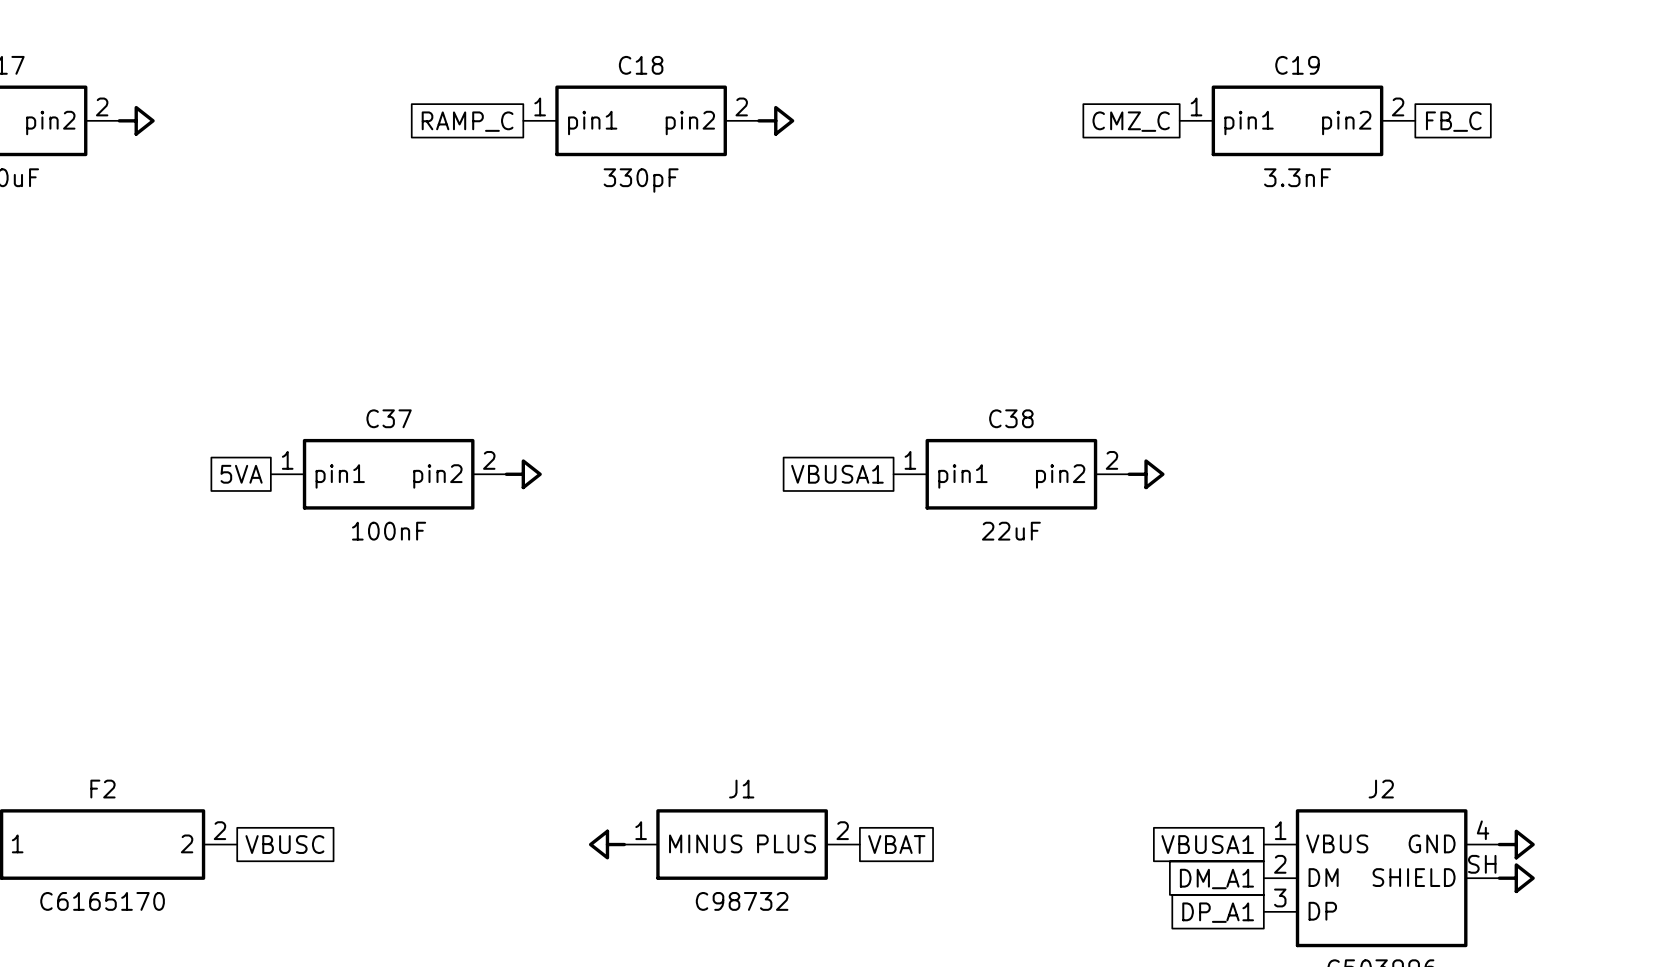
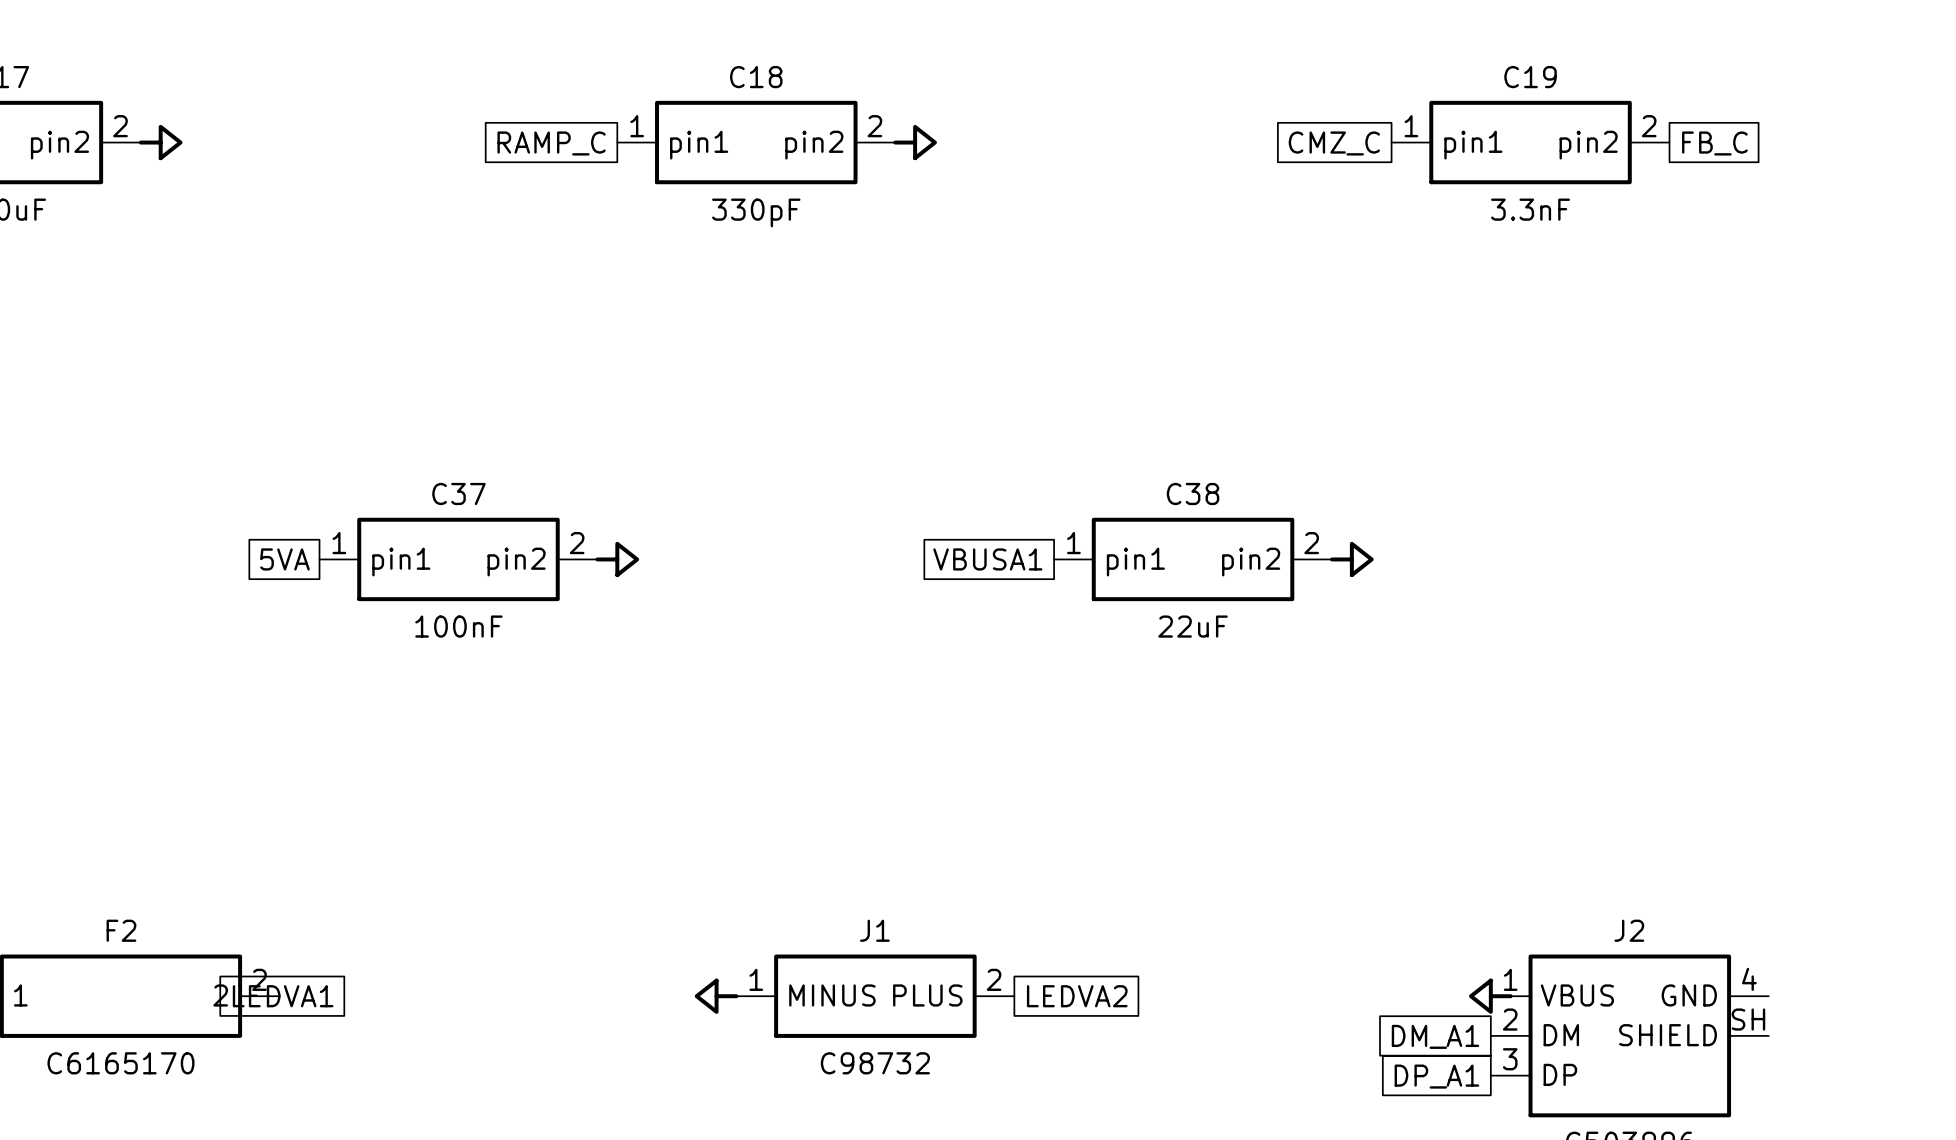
global label: none -> LEDVA1 (283, 996)
global label: VBUSC (284, 844) -> none
global label: VBAT (896, 844) -> LEDVA2 (1077, 996)
global label: VBUSA1 (1207, 844) -> none
power symbol: none -> (1490, 996)
power symbol: (1516, 844) -> none
power symbol: (1516, 878) -> none

